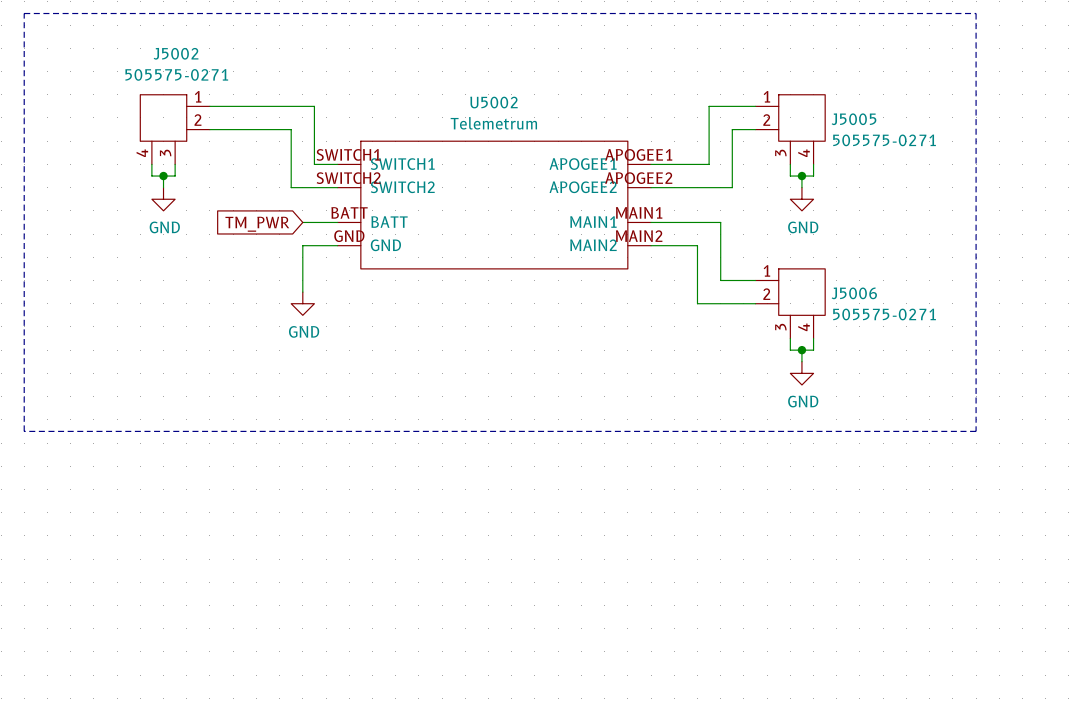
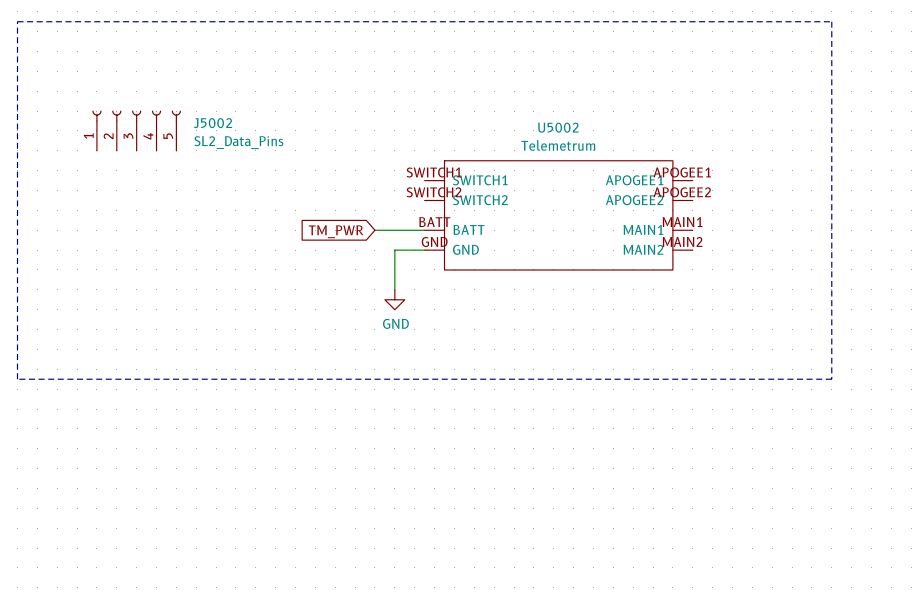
J5002 name position: J5002 (176, 53) -> J5002 (212, 123)
J5002 value: 505575-0271 (176, 74) -> SL2_Data_Pins (238, 142)
J5002 symbol: [140, 94, 210, 165] -> [92, 110, 181, 151]
wire: (209, 106) (314, 106) (314, 164) (337, 164) -> none
wire: (755, 106) (709, 106) (709, 164) (651, 164) -> none
wire: (209, 129) (291, 129) (291, 187) (337, 187) -> none
wire: (755, 129) (732, 129) (732, 187) (651, 187) -> none
J5005: 505575-0271 (790, 129) -> none
wire: (151, 164) (151, 176) (175, 176) (175, 164) -> none
wire: (790, 164) (790, 176) (813, 176) (813, 164) -> none
wire: (163, 176) (163, 187) -> none
junction: (163, 176) -> none
wire: (801, 176) (801, 187) -> none
junction: (801, 176) -> none
power symbol: GND (163, 199) -> none
power symbol: GND (801, 199) -> none
U5002 position: (494, 205) -> (558, 215)
wire: (302, 222) (337, 222) -> none
wire: (651, 222) (720, 222) (720, 280) (755, 280) -> none
global label position: TM_PWR (257, 224) -> TM_PWR (336, 231)
wire: (337, 245) (302, 245) (302, 292) -> (424, 250) (394, 250) (394, 289)
wire: (651, 245) (697, 245) (697, 303) (755, 303) -> none
wire: none -> (374, 230) (424, 230)
power symbol: GND (302, 303) -> none
J5006: 505575-0271 (790, 303) -> none
power symbol: none -> GND (394, 299)
wire: (790, 338) (790, 350) (813, 350) (813, 338) -> none
wire: (801, 350) (801, 361) -> none
junction: (801, 350) -> none
power symbol: GND (801, 373) -> none

